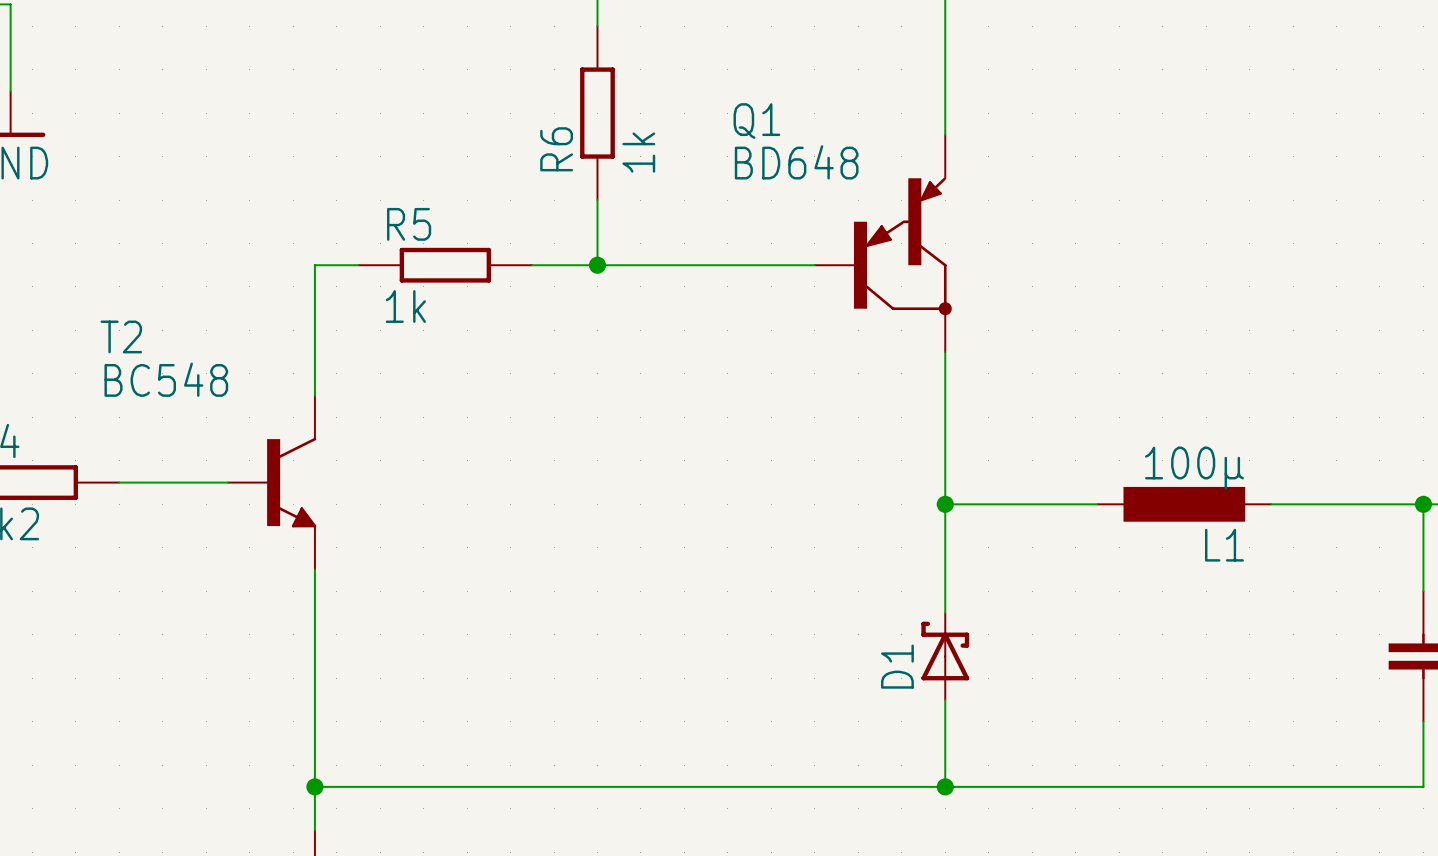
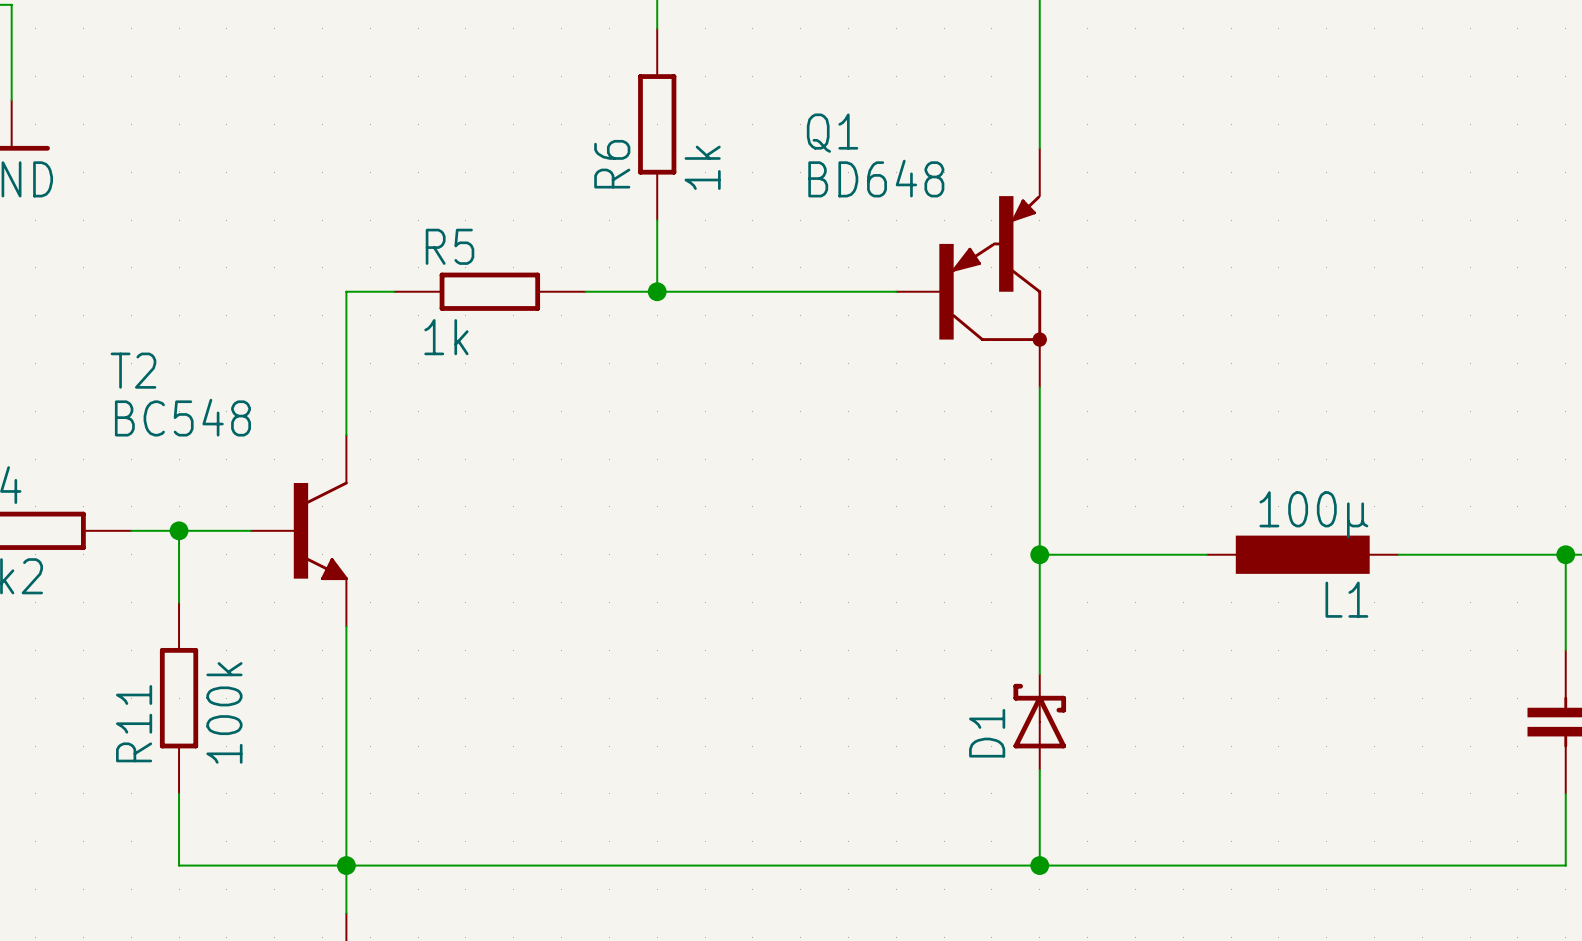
wire: none -> (179, 530) (179, 602)
junction: none -> (179, 530)
R11: none -> 100k (179, 698)
wire: none -> (179, 793) (179, 865) (346, 865)

